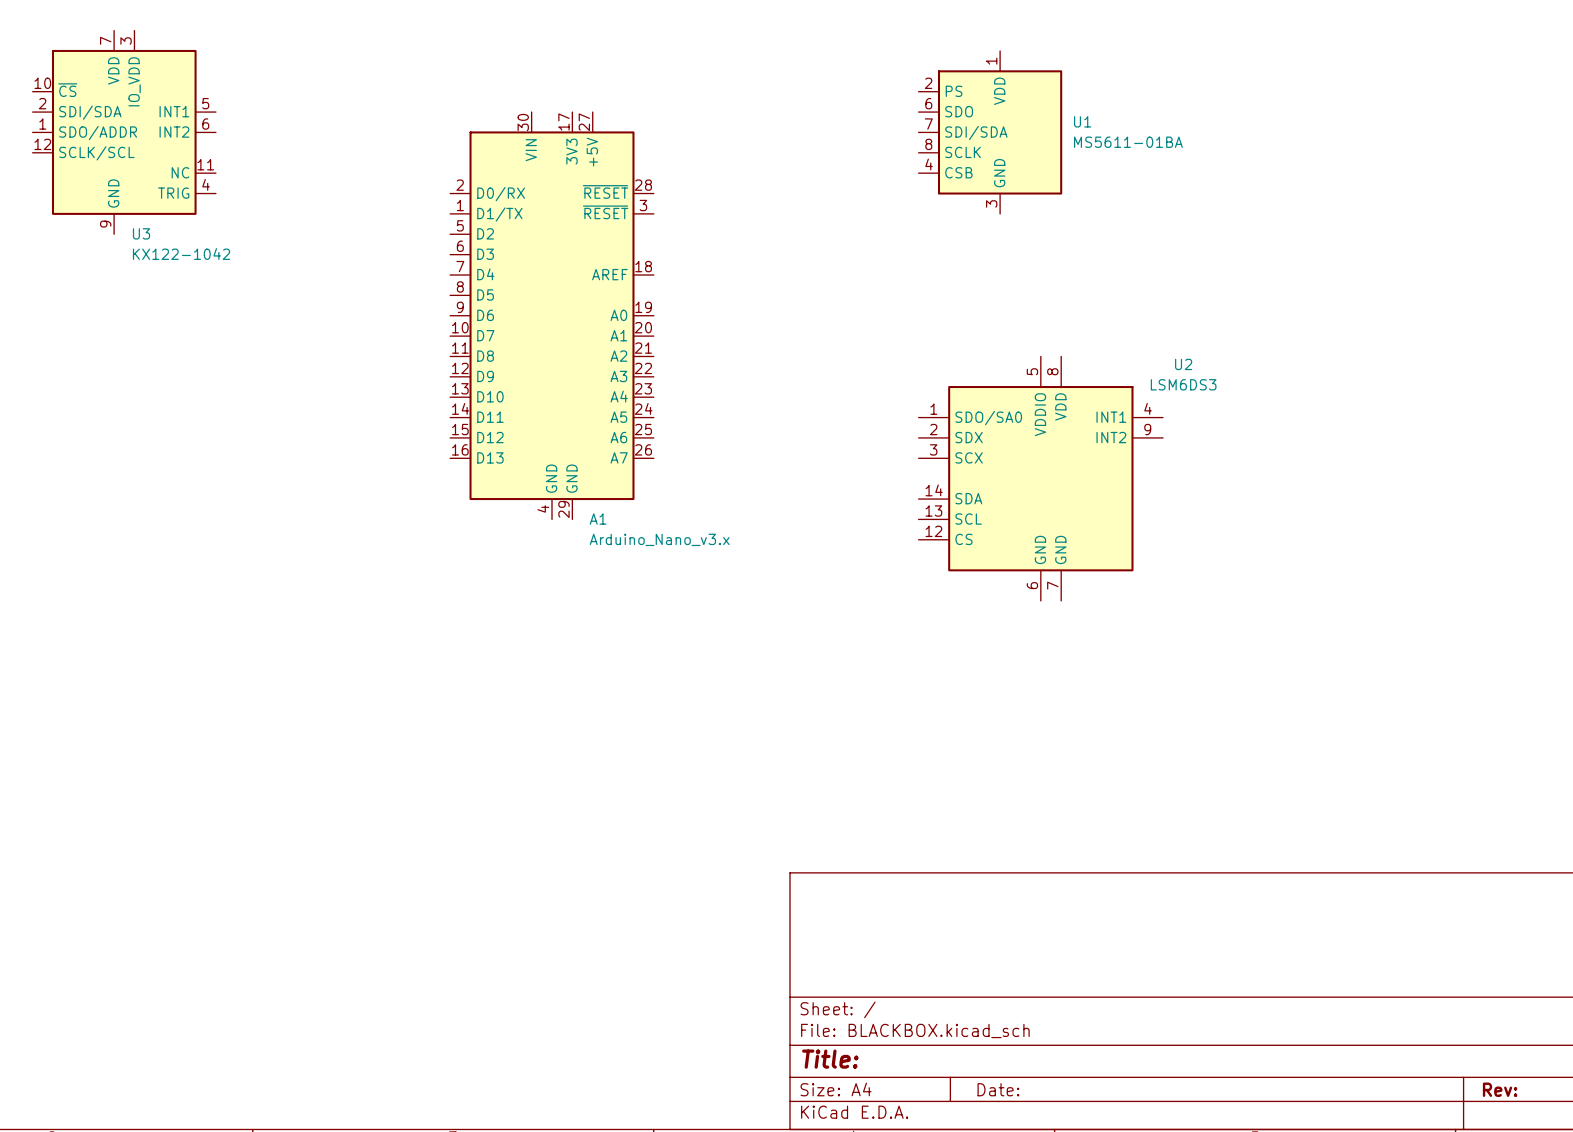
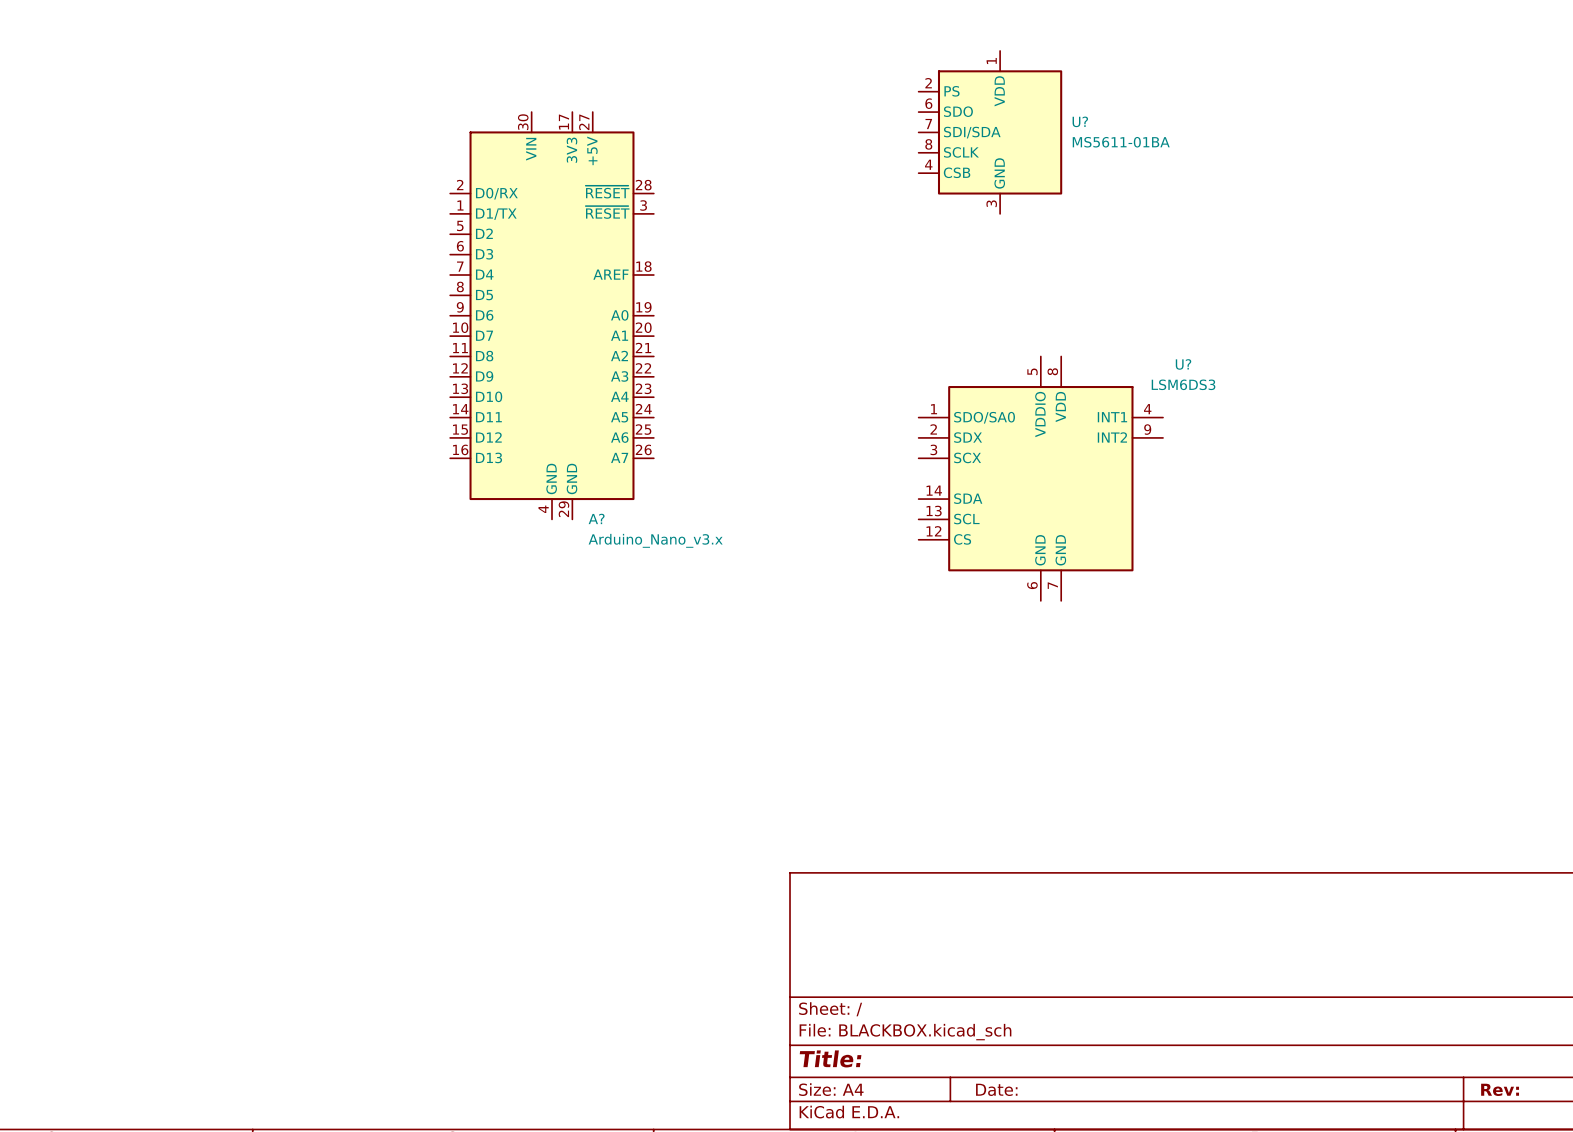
U1 name: U1 (1082, 121) -> U? (1080, 121)
U3: KX122-1042 (124, 132) -> none
U2 name: U2 (1183, 364) -> U? (1183, 364)
A1 name: A1 (598, 519) -> A? (596, 518)

